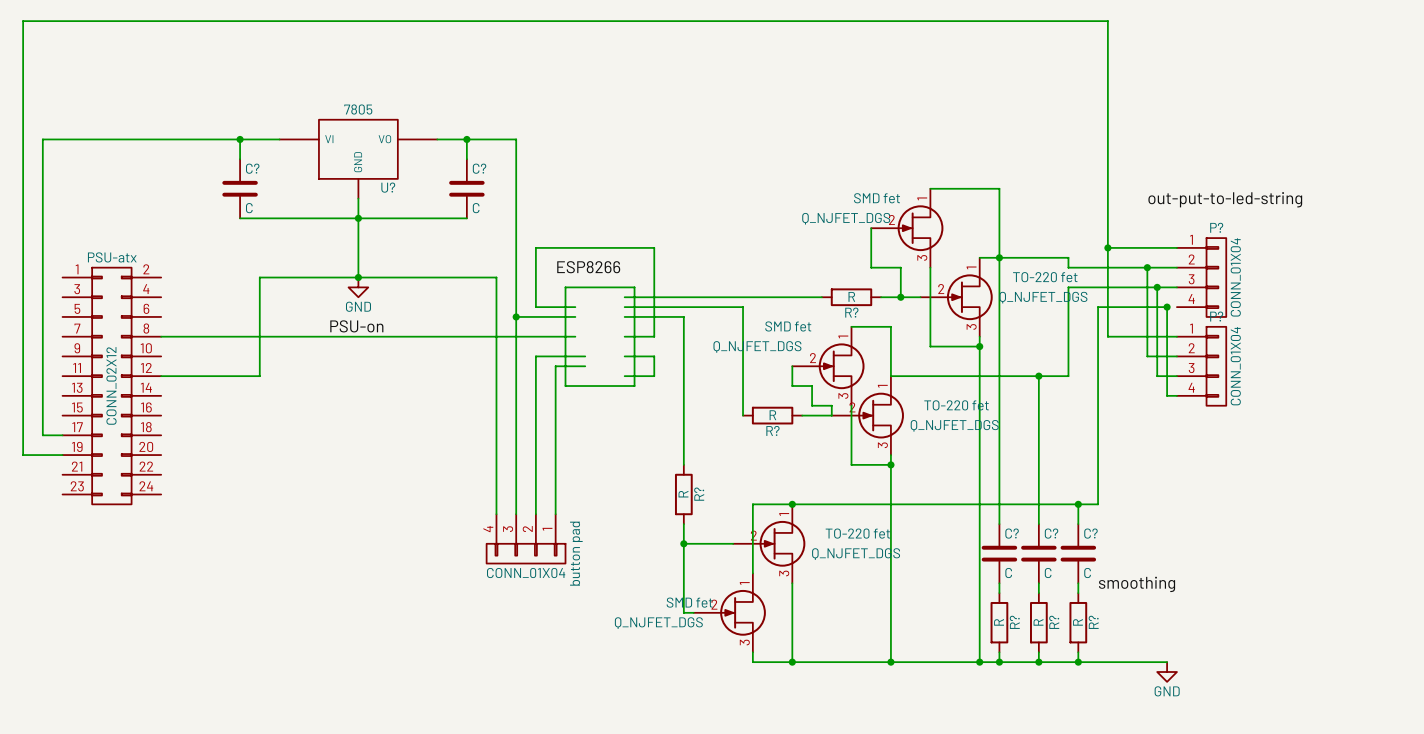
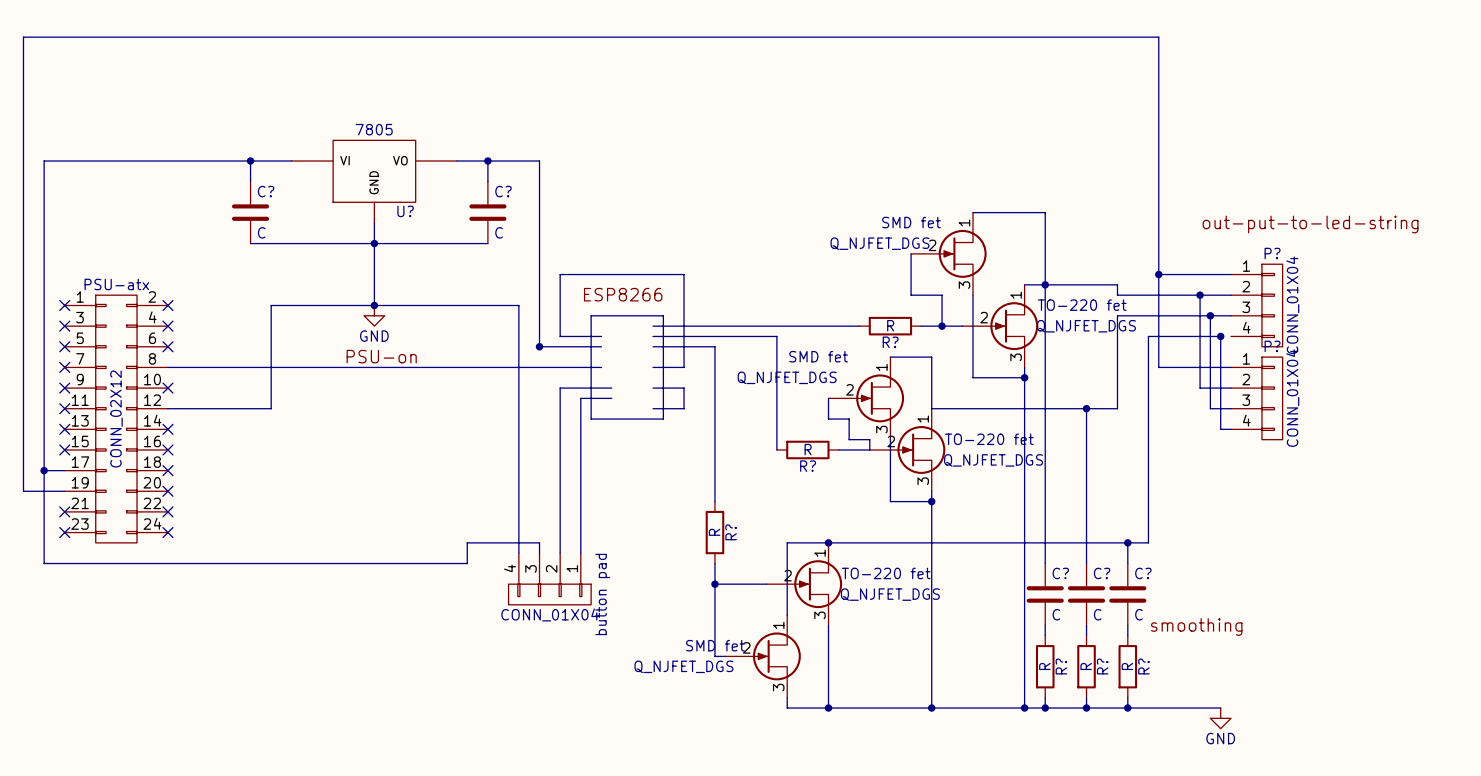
no-connect mark: none -> (64, 305)
no-connect mark: none -> (167, 305)
no-connect mark: none -> (64, 326)
no-connect mark: none -> (167, 326)
no-connect mark: none -> (64, 346)
no-connect mark: none -> (167, 346)
wire: (516, 316) (516, 504) -> (44, 470) (44, 563) (467, 563) (467, 542) (539, 542)
no-connect mark: none -> (64, 367)
no-connect mark: none -> (64, 388)
no-connect mark: none -> (167, 388)
no-connect mark: none -> (64, 408)
no-connect mark: none -> (64, 429)
no-connect mark: none -> (167, 429)
no-connect mark: none -> (64, 449)
no-connect mark: none -> (167, 449)
junction: none -> (44, 470)
no-connect mark: none -> (167, 470)
no-connect mark: none -> (167, 491)
no-connect mark: none -> (64, 511)
no-connect mark: none -> (167, 511)
no-connect mark: none -> (64, 532)
no-connect mark: none -> (167, 532)

